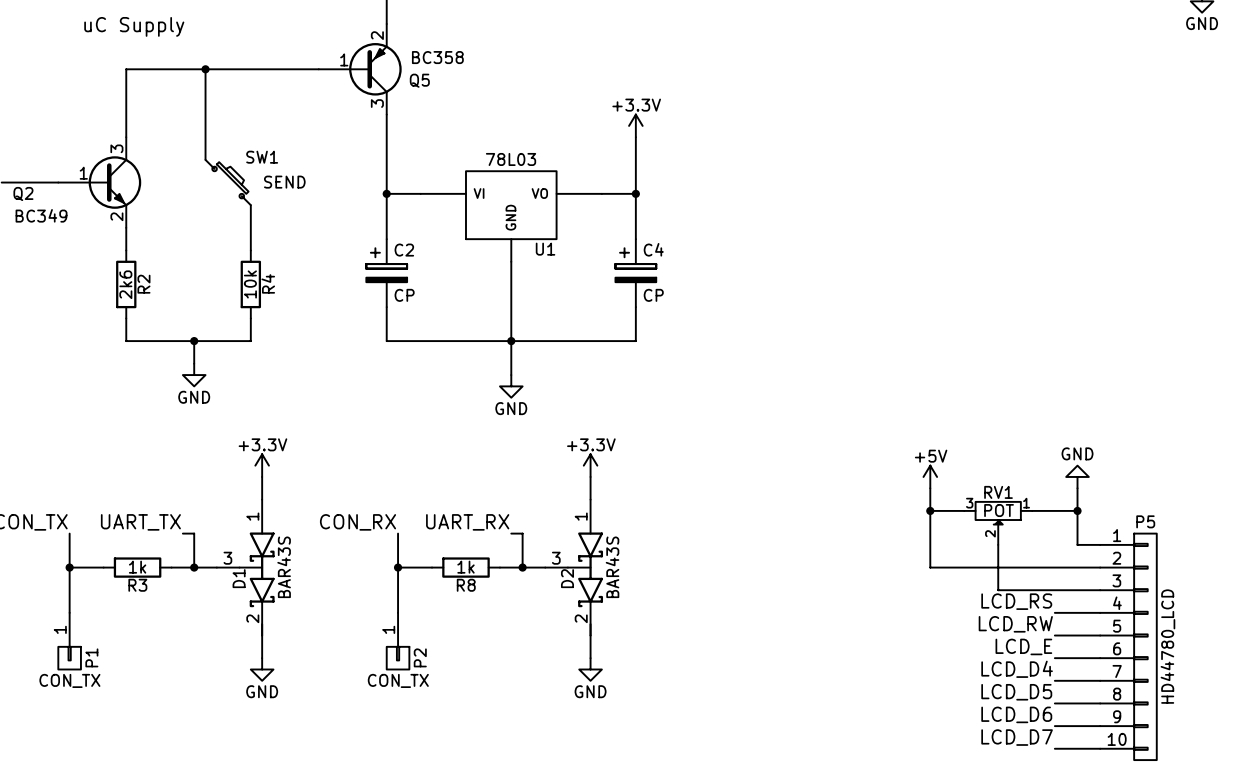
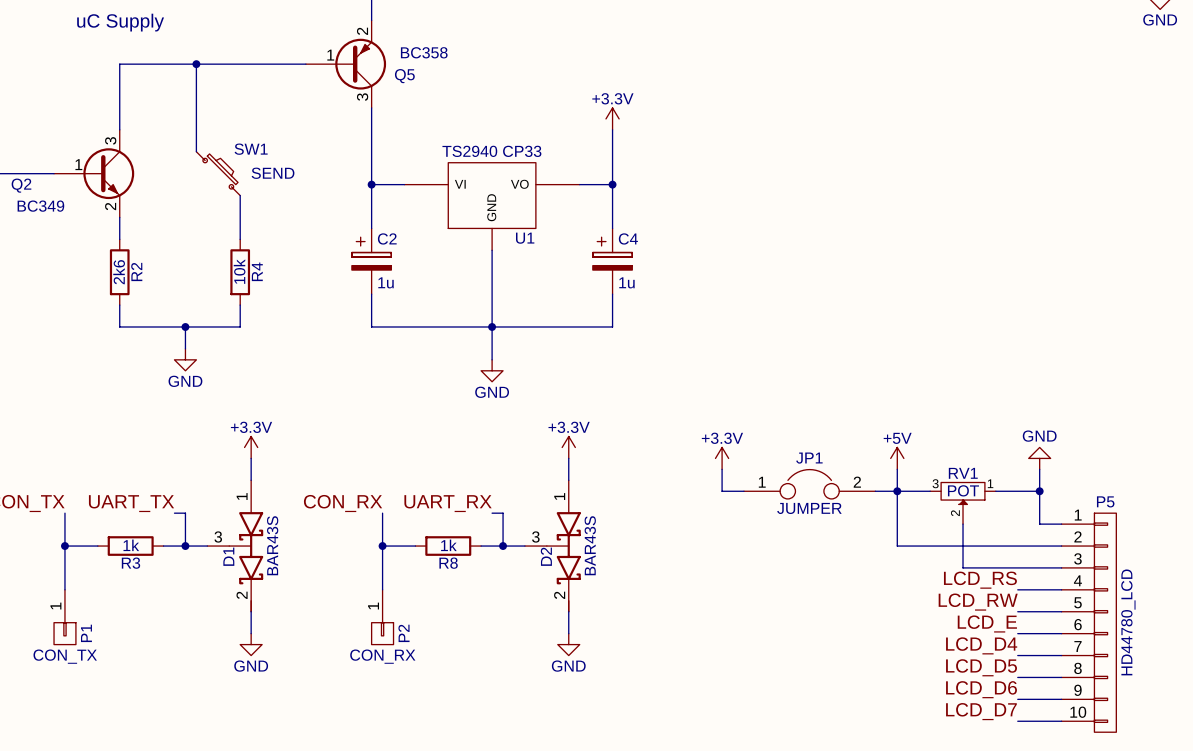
U1 value: 78L03 (511, 159) -> TS2940 CP33 (491, 151)
C2 value: CP (404, 295) -> 1u (386, 282)
C4 value: CP (653, 295) -> 1u (626, 282)
power symbol: none -> +3.3V (722, 458)
wire: none -> (722, 469) (722, 491) (743, 491)
JP1: none -> JUMPER (809, 484)
wire: none -> (875, 491) (897, 491)
P2 value: CON_TX (398, 680) -> CON_RX (382, 656)

